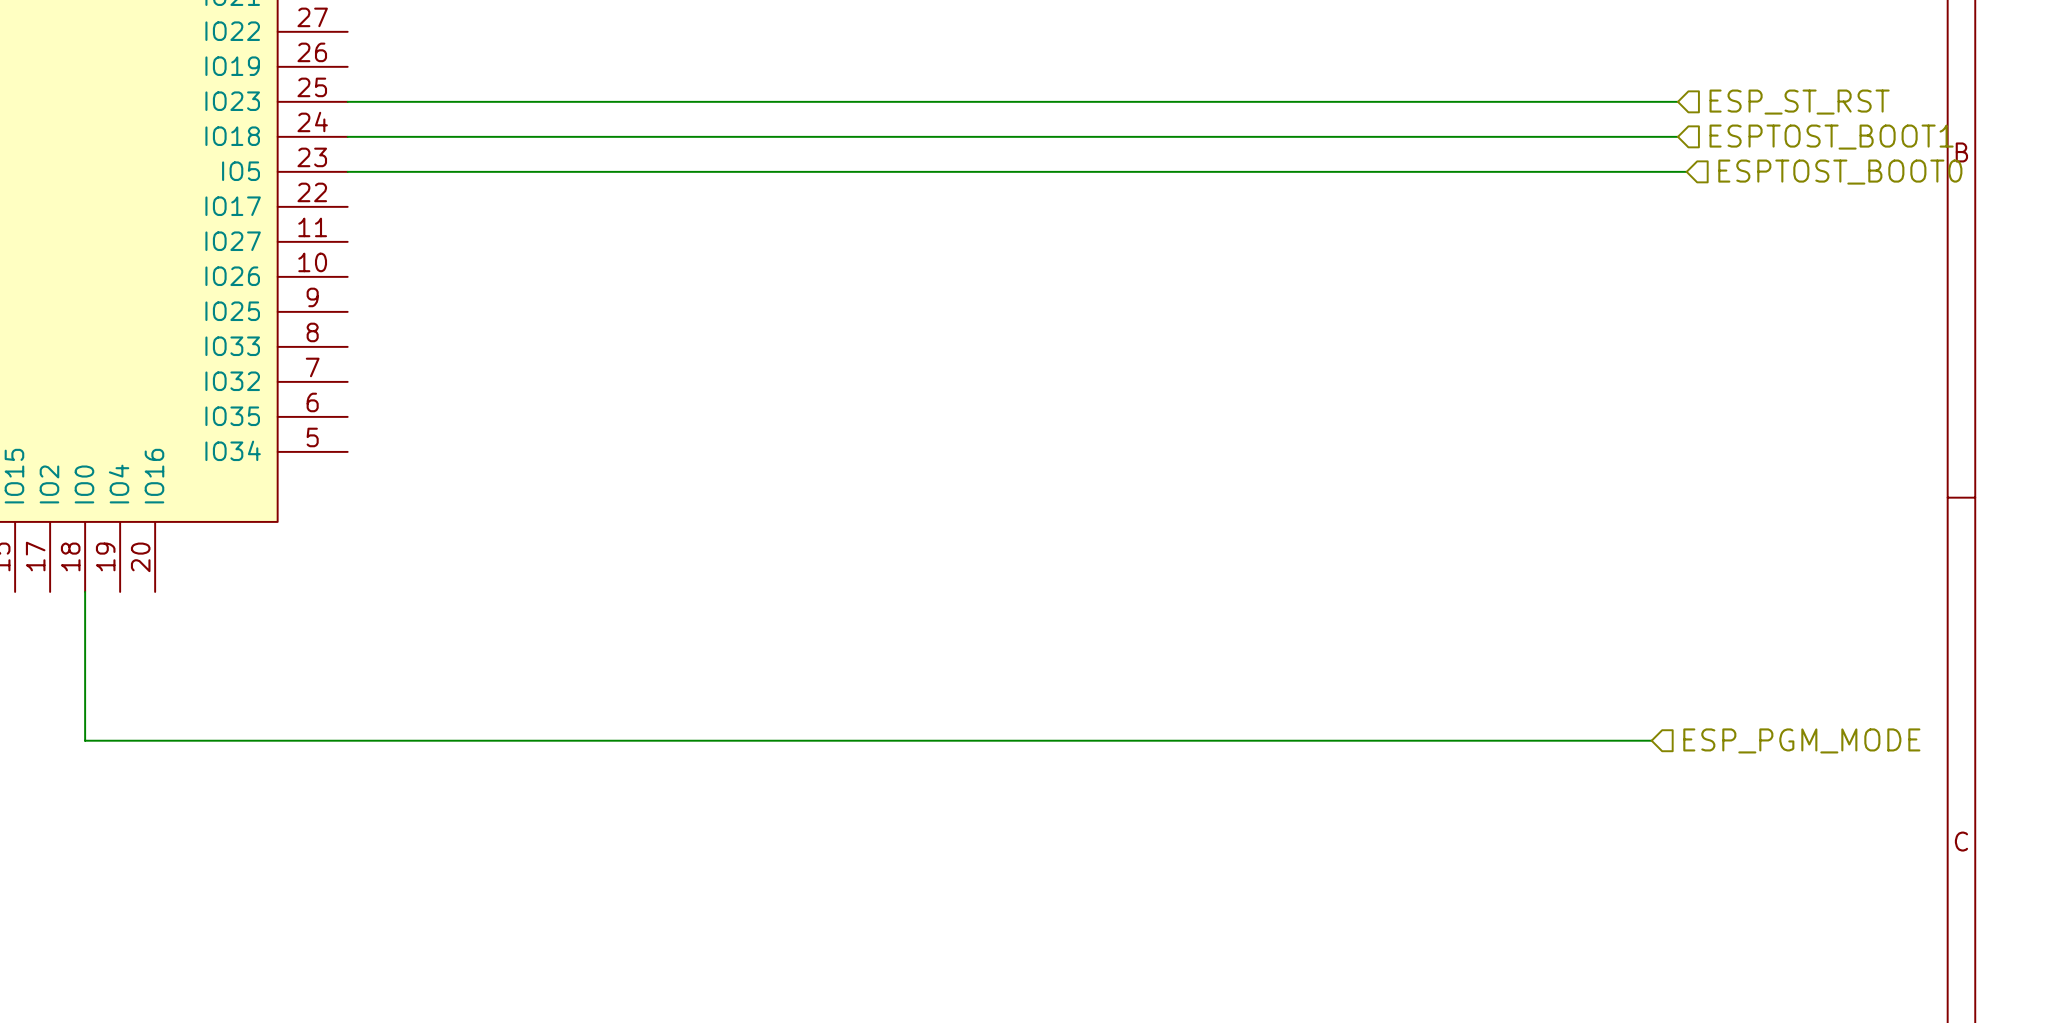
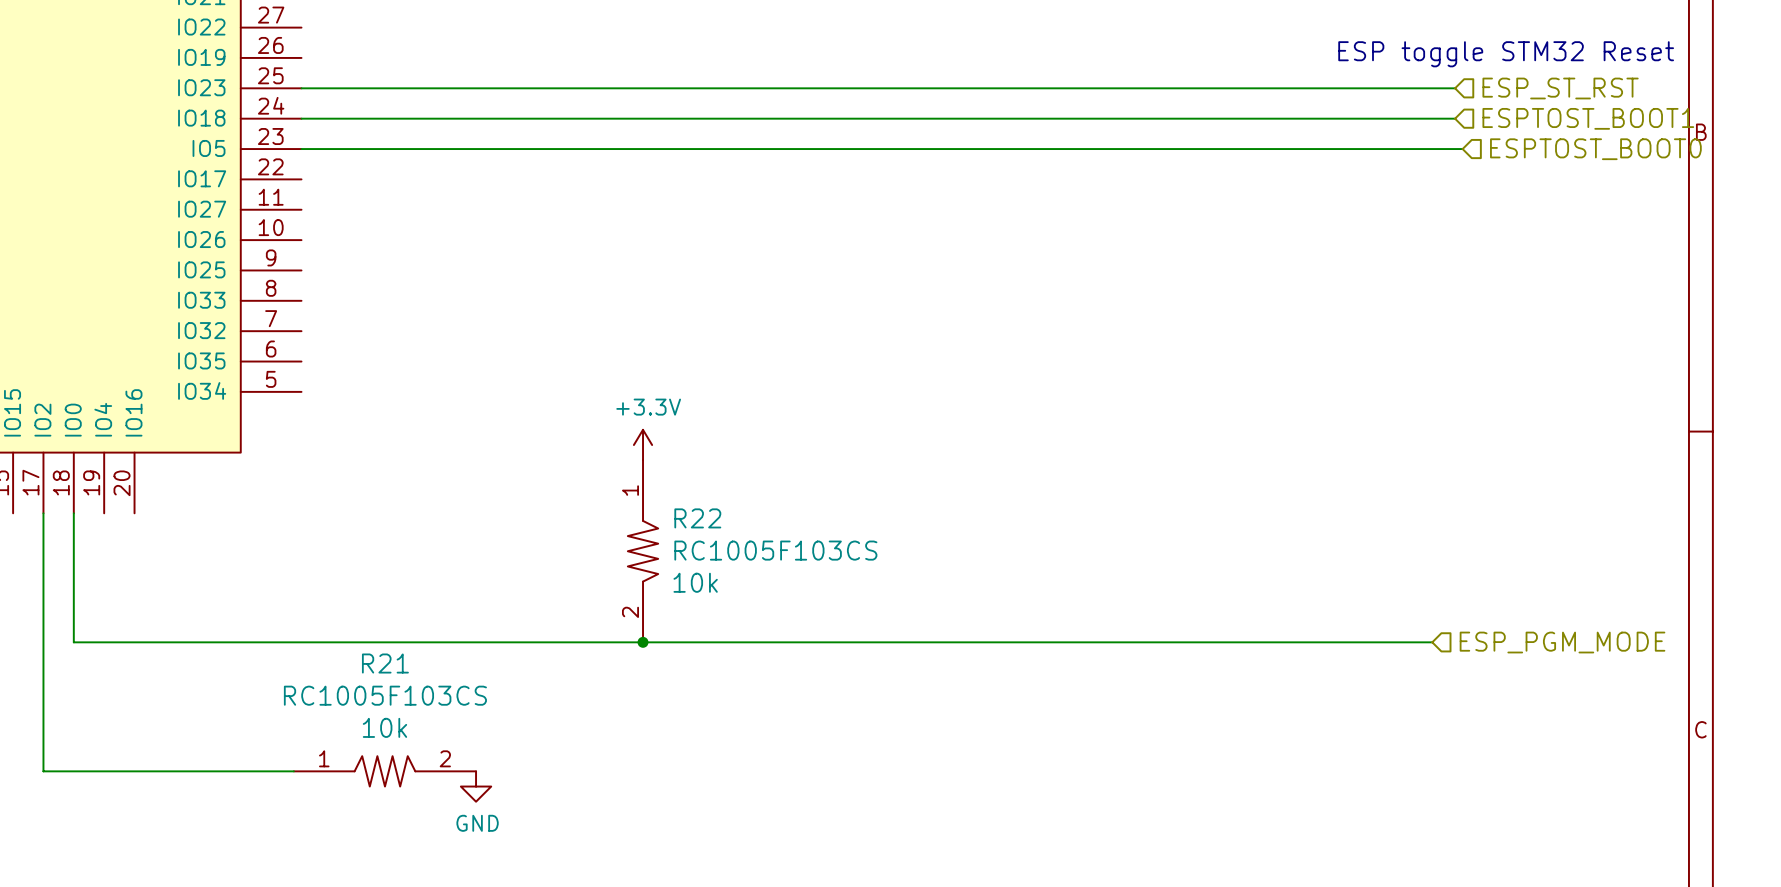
text: none -> ESP toggle STM32 Reset (1506, 54)
power symbol: none -> +3.3V (643, 445)
wire: none -> (43, 513) (43, 771) (293, 771)
R22: none -> RC1005F103CS (643, 551)
junction: none -> (643, 642)
R21: none -> RC1005F103CS (384, 771)
power symbol: none -> GND (476, 786)

